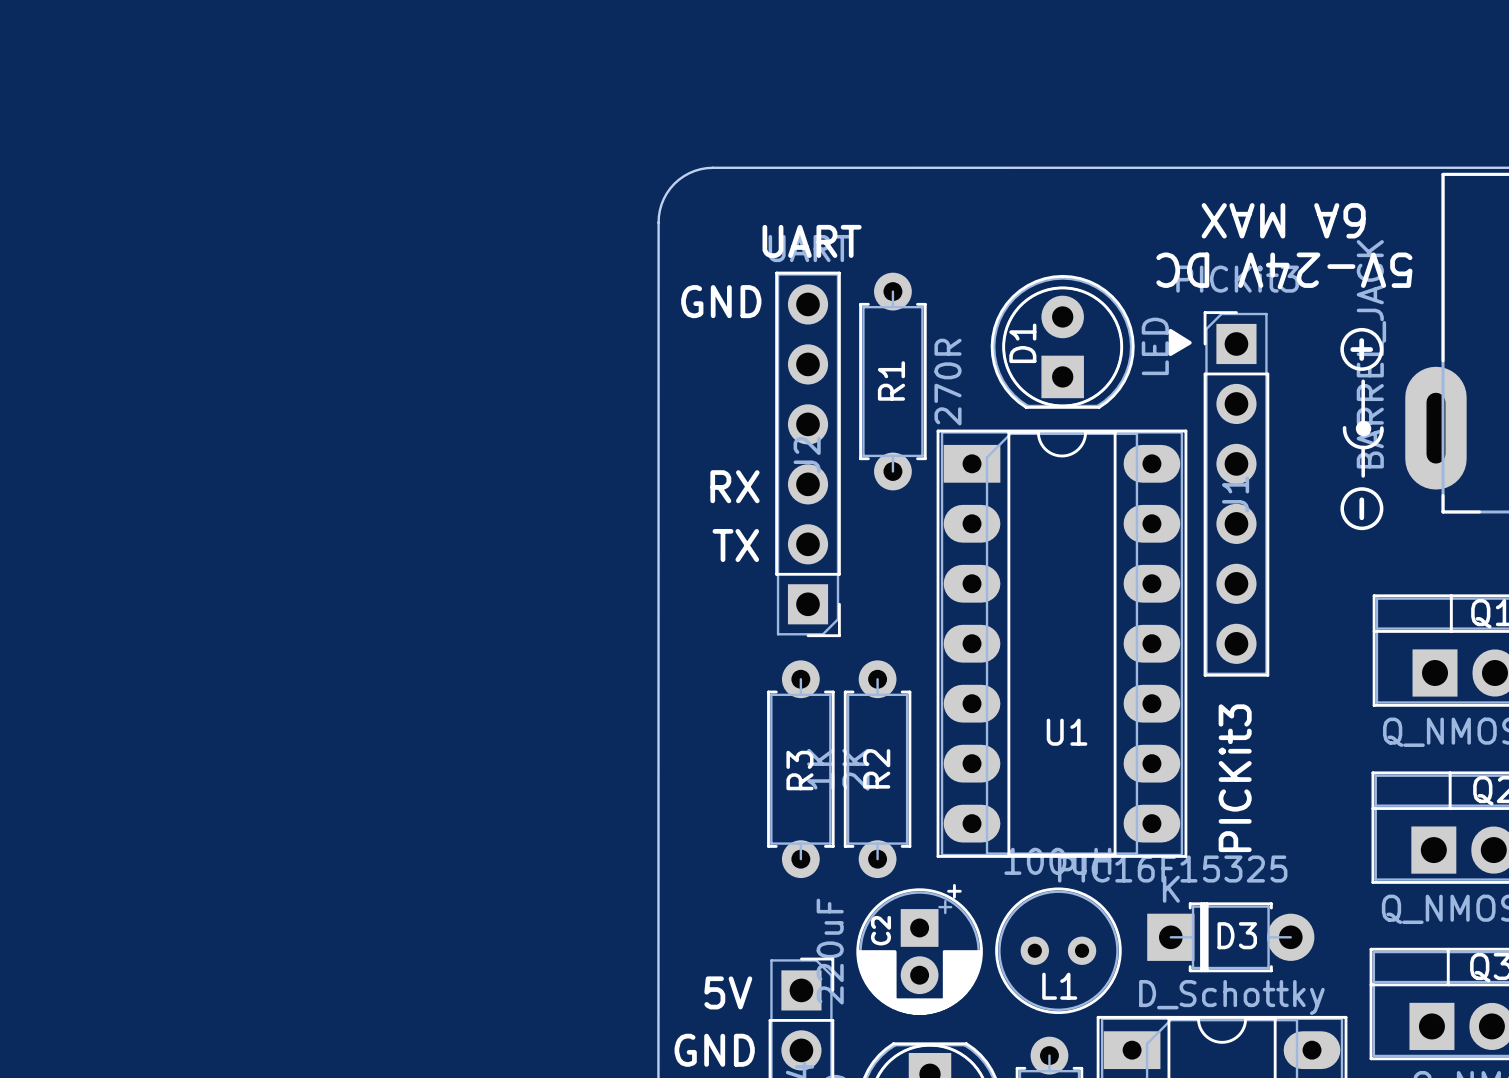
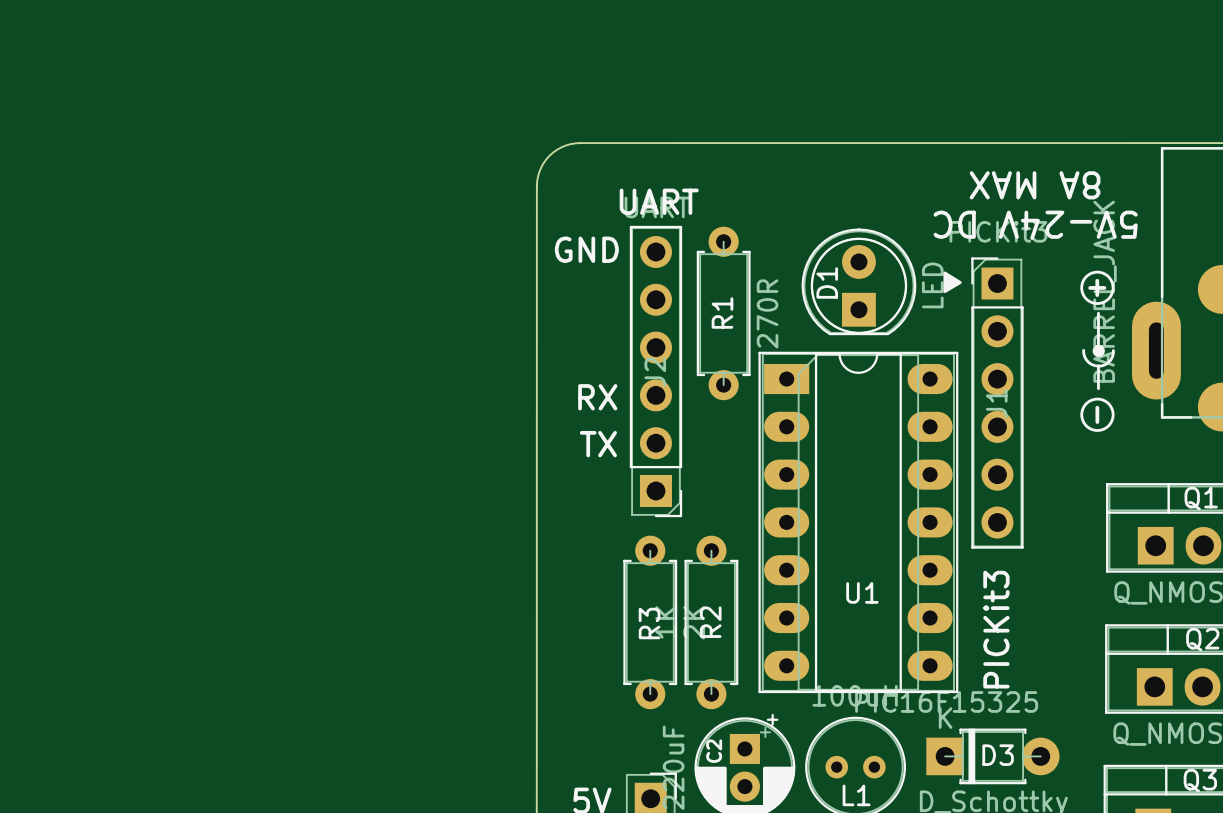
text: 6A MAX (1283, 220) -> 8A MAX (1035, 185)

